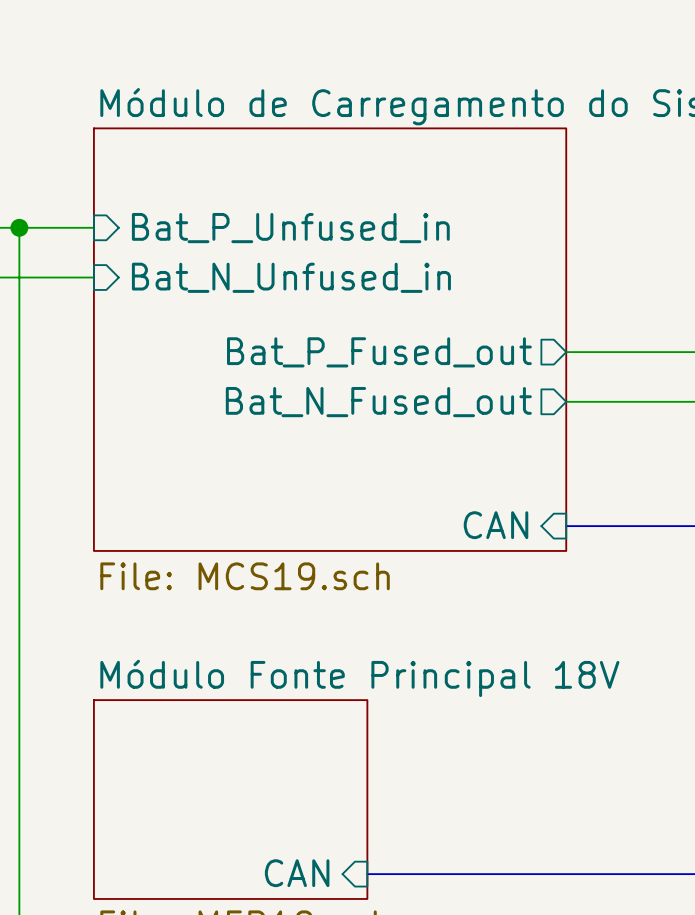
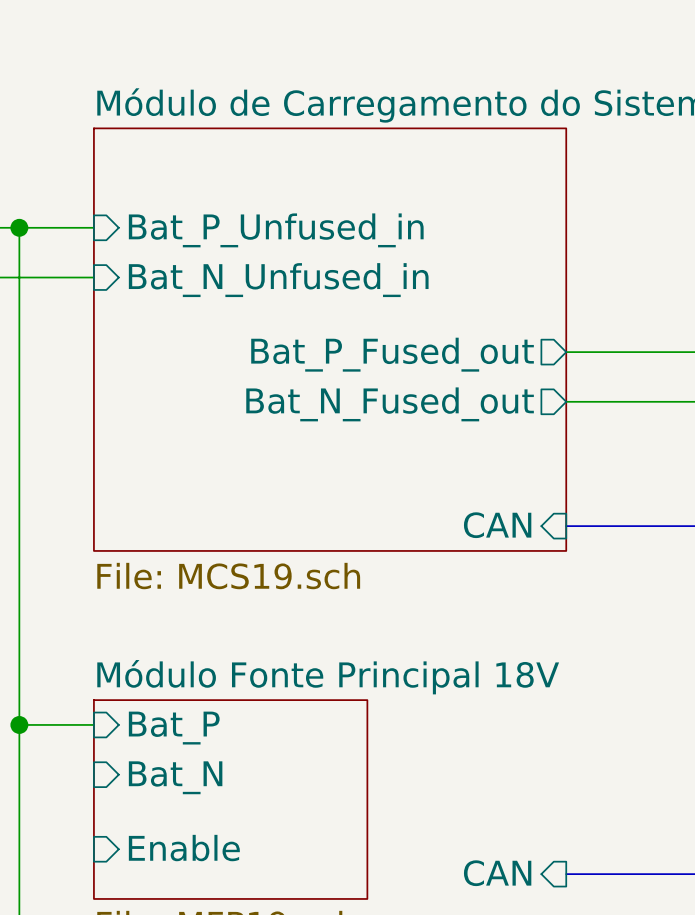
wire: none -> (19, 724) (93, 724)
junction: none -> (19, 724)
sheet pin: none -> Bat_P (174, 728)
sheet pin: none -> Bat_N (175, 777)
sheet pin: none -> Enable (184, 848)
sheet pin position: CAN (297, 873) -> CAN (497, 873)
bus: (367, 874) (566, 874) -> none

